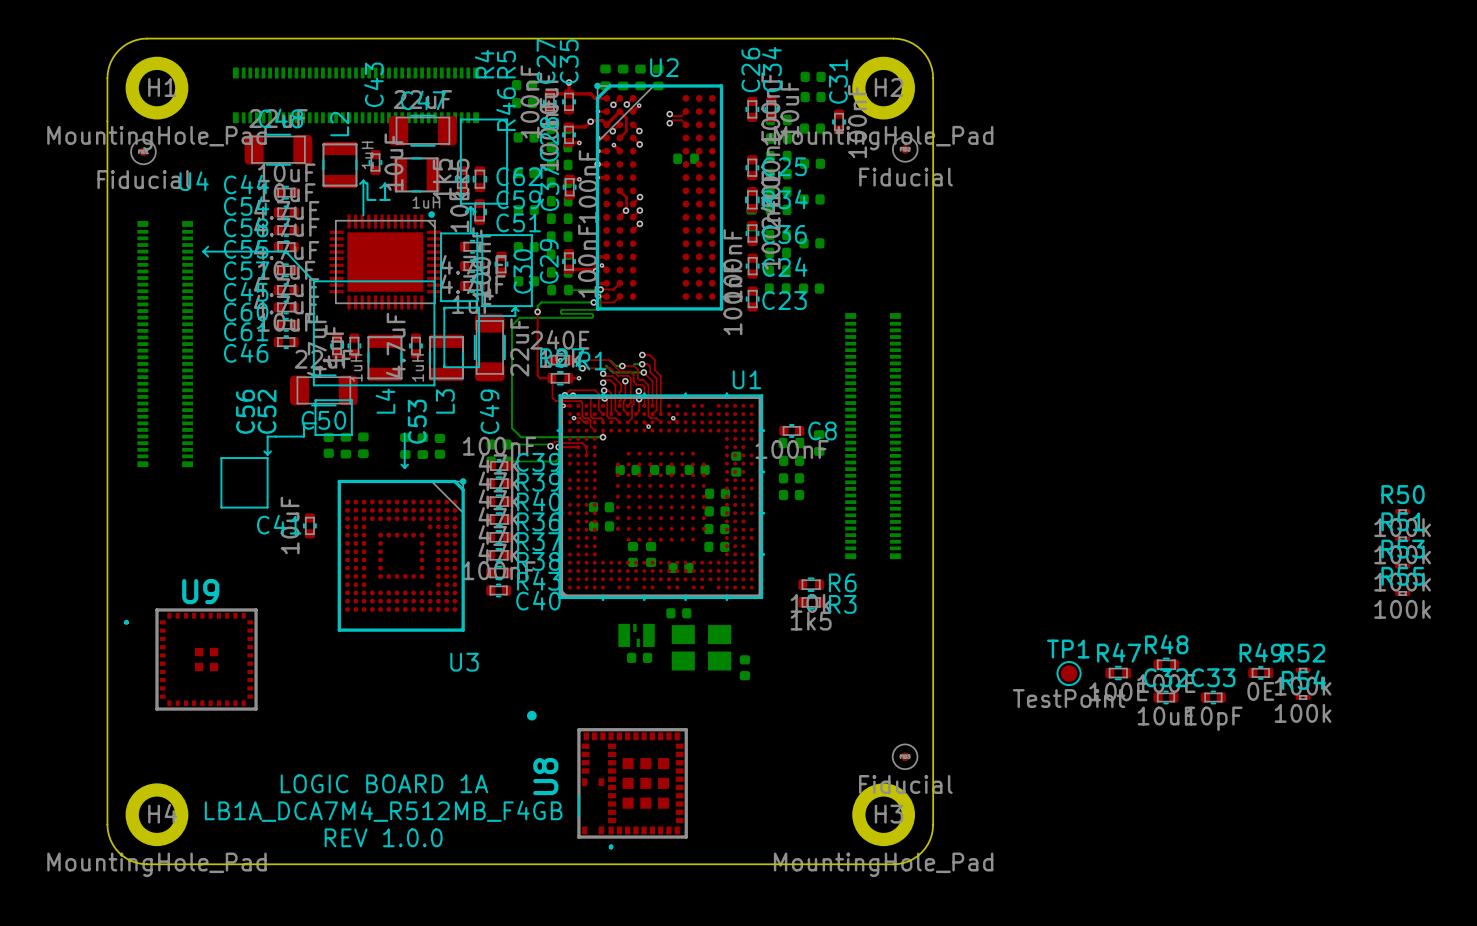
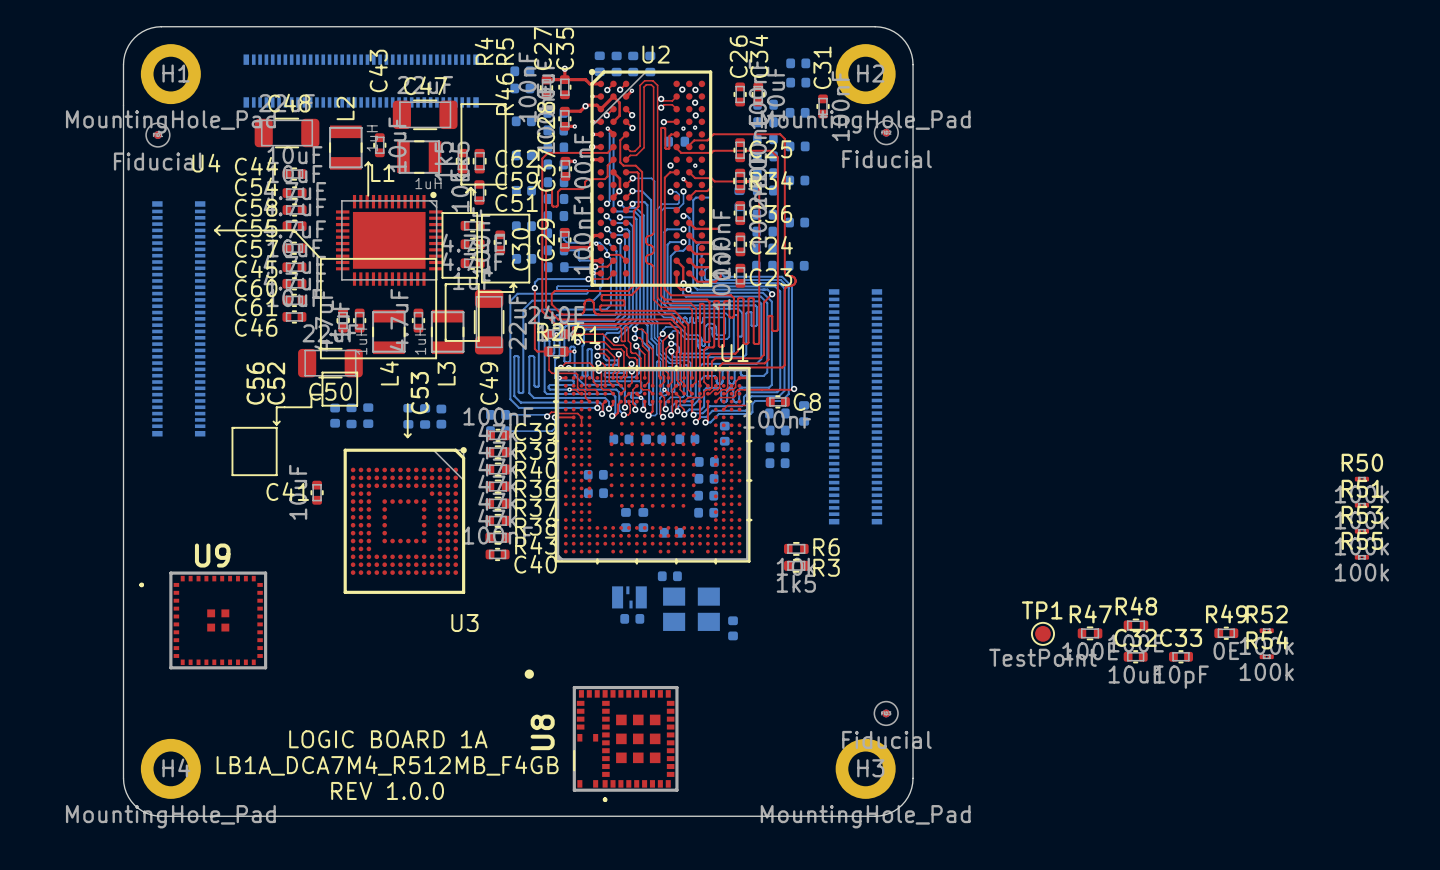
via: none -> (682, 89)
via: none -> (695, 89)
via: none -> (695, 102)
via: none -> (695, 115)
top track: none -> (676, 121) (663, 122)
via: none -> (663, 122)
via: none -> (695, 127)
via: none -> (683, 128)
top track: none -> (626, 134) (620, 140) (620, 162) (623, 165) (635, 165) (642, 172) (642, 284) (631, 295) (602, 295) (602, 300) (623, 300) (624, 305) (601, 305) (600, 309) (674, 310) (688, 324) (688, 370)
top track: none -> (676, 134) (669, 136) (669, 148) (666, 148) (665, 128) (661, 128) (661, 295) (665, 299) (707, 299) (709, 301) (708, 342) (704, 341) (704, 304) (700, 304) (700, 385)
top track: none -> (613, 147) (607, 152) (547, 152) (542, 158) (542, 311) (554, 323) (669, 323) (677, 330) (676, 380) (680, 383) (680, 389) (684, 393)
top track: none -> (626, 147) (630, 151) (634, 151) (640, 146) (640, 85) (644, 80) (653, 80) (657, 85) (657, 297) (662, 303) (691, 303) (696, 308) (696, 381) (692, 385)
top track: none -> (676, 147) (681, 152) (771, 150) (777, 157) (777, 329) (772, 330) (772, 316) (769, 315) (768, 359) (764, 363) (722, 363) (719, 366) (719, 387) (707, 393)
top track: none -> (689, 147) (694, 140) (707, 140) (713, 134) (780, 134) (784, 138) (784, 271) (786, 275) (793, 277) (795, 280) (793, 284) (787, 286) (784, 289) (784, 365) (782, 367) (729, 367) (727, 369) (727, 387) (715, 393)
top track: none -> (613, 159) (607, 165) (607, 176) (604, 179) (587, 179) (582, 189) (560, 189) (557, 191) (556, 206) (552, 205) (552, 190) (546, 191) (546, 307) (558, 319) (671, 319) (681, 328) (680, 379) (684, 385)
top track: none -> (626, 159) (630, 155) (636, 155) (644, 147) (644, 87) (651, 84) (653, 87) (653, 231) (652, 234) (646, 237) (645, 241) (647, 244) (652, 246) (653, 250) (652, 253) (646, 256) (645, 261) (653, 267) (653, 299) (661, 307) (689, 307) (692, 310) (692, 377)
via: none -> (670, 165)
via: none -> (695, 165)
top track: none -> (626, 172) (638, 173) (638, 206) (633, 211) (633, 285) (628, 290) (554, 290) (551, 294) (551, 304) (561, 314) (581, 313) (584, 310) (584, 302) (589, 299) (593, 302) (594, 310) (597, 314) (671, 314) (684, 327) (684, 377)
top track: none -> (676, 172) (670, 172) (664, 177) (664, 289) (670, 295) (731, 295) (733, 298) (732, 317) (729, 316) (729, 302) (724, 302) (722, 346) (718, 345) (718, 301) (714, 301) (714, 346) (706, 347) (704, 350) (704, 381) (707, 385)
top track: none -> (689, 172) (695, 178) (711, 178) (714, 181) (756, 181) (759, 184) (759, 343) (753, 343) (752, 297) (748, 298) (748, 342) (743, 343) (743, 299) (739, 297) (738, 351) (735, 353) (710, 353) (707, 356) (707, 377)
bottom track: none -> (632, 178) (651, 178) (654, 181) (654, 319) (657, 322) (657, 336) (662, 341) (662, 351) (671, 360) (688, 360) (690, 363) (690, 395) (687, 395) (687, 365) (684, 364) (683, 396) (670, 397) (665, 402) (665, 409)
top track: none -> (683, 179) (689, 184)
via: none -> (683, 179)
top track: none -> (711, 186) (707, 191) (695, 191) (689, 197)
bottom track: none -> (632, 191) (642, 191) (651, 200) (651, 319) (654, 323) (654, 337) (659, 343) (659, 353) (669, 363) (681, 364) (680, 384) (677, 384) (677, 367) (674, 367) (674, 391) (671, 391) (671, 367) (668, 367) (668, 392) (659, 397) (659, 413) (663, 416)
bottom track: none -> (683, 191) (683, 203) (678, 208) (664, 208) (661, 210) (661, 309) (665, 313) (725, 313) (729, 316) (729, 336) (727, 339) (715, 338) (712, 335) (712, 328) (710, 327) (708, 345) (703, 349) (698, 347) (697, 339) (685, 339) (677, 330) (673, 330) (671, 336)
via: none -> (683, 191)
bottom track: none -> (670, 191) (676, 191) (679, 194) (679, 202) (662, 204) (657, 209) (657, 311) (663, 317) (673, 317) (675, 322) (678, 317) (681, 322) (684, 317) (688, 322) (690, 317) (694, 322) (698, 317) (701, 322) (703, 317) (724, 317) (725, 333) (717, 335) (715, 325) (708, 324) (705, 327) (703, 345) (699, 336) (687, 335) (679, 326) (666, 326) (662, 330) (662, 333)
via: none -> (670, 191)
bottom track: none -> (710, 197) (695, 197) (693, 200) (693, 285) (697, 289) (767, 289) (772, 294)
bottom track: none -> (632, 202) (644, 202) (647, 205) (647, 320) (651, 324) (651, 339) (656, 344) (656, 354) (663, 361) (663, 392) (660, 391) (660, 362) (657, 361) (656, 413) (648, 415)
bottom track: none -> (607, 203) (609, 201) (609, 133) (612, 132) (613, 208) (616, 211) (634, 211) (640, 216) (640, 321) (635, 325) (635, 338)
via: none -> (607, 203)
bottom track: none -> (620, 203) (624, 207) (636, 207) (643, 215) (643, 321) (647, 325) (647, 340) (653, 346) (652, 404) (649, 403) (649, 348) (642, 341) (643, 330)
via: none -> (620, 203)
via: none -> (606, 216)
bottom track: none -> (683, 216) (689, 218) (689, 244) (683, 250) (676, 250) (670, 256) (670, 299) (673, 301) (758, 301) (761, 303) (761, 359) (756, 363) (702, 363) (695, 370) (695, 397) (691, 401) (677, 401) (671, 406) (670, 415)
via: none -> (683, 216)
via: none -> (619, 217)
top track: none -> (689, 222) (695, 228) (719, 228)
bottom track: none -> (607, 229) (613, 235) (625, 236) (625, 315) (615, 325) (566, 325) (564, 327) (564, 361) (570, 360) (570, 347) (573, 346) (574, 375) (584, 384) (619, 384) (624, 390) (624, 400) (632, 401) (635, 404) (635, 409)
via: none -> (607, 229)
bottom track: none -> (619, 229) (629, 231) (629, 317) (617, 329) (585, 329) (583, 331) (582, 375) (587, 375) (587, 349) (590, 349) (591, 377) (595, 381) (639, 381) (641, 391) (631, 392) (631, 397) (643, 399) (643, 409)
via: none -> (619, 229)
bottom track: none -> (683, 229) (667, 229) (664, 232) (664, 304) (668, 308) (738, 308) (742, 312) (742, 335) (737, 335) (737, 315) (734, 315) (733, 351) (731, 353) (680, 353) (679, 347) (675, 343) (671, 343)
via: none -> (683, 229)
bottom track: none -> (563, 233) (563, 239) (567, 242) (599, 242) (607, 250) (607, 254) (610, 258) (610, 304) (606, 309) (541, 309) (538, 312) (538, 385) (534, 385) (534, 357) (530, 355) (529, 393) (534, 397) (605, 397) (608, 401) (608, 408)
top track: none -> (689, 235) (696, 242) (708, 242)
bottom track: none -> (619, 241) (620, 314) (614, 320) (562, 320) (559, 323) (559, 355) (555, 359) (555, 377) (557, 380) (572, 380) (573, 384) (550, 385) (548, 388) (616, 389) (619, 392) (619, 410) (623, 414)
via: none -> (619, 241)
bottom track: none -> (606, 241) (616, 251) (616, 313) (614, 315) (556, 315) (554, 317) (553, 354) (549, 353) (549, 341) (544, 340) (544, 391) (547, 394) (612, 394) (615, 396) (615, 412) (612, 415)
via: none -> (606, 241)
bottom track: none -> (683, 242) (670, 242) (667, 244) (667, 302) (670, 305) (755, 305) (756, 325) (751, 325) (751, 312) (747, 312) (746, 354) (743, 357) (674, 357) (671, 351)
via: none -> (683, 242)
bottom track: none -> (708, 242) (700, 242) (697, 245) (697, 282) (700, 286) (775, 286) (780, 291) (780, 389) (777, 392) (748, 392) (743, 397) (743, 403) (741, 406) (709, 406) (702, 413) (693, 414)
top track: none -> (689, 248) (695, 253) (710, 253)
bottom track: none -> (564, 250) (577, 250) (579, 260) (599, 260) (602, 263) (602, 285) (600, 287) (600, 293) (593, 300) (532, 300) (523, 309) (523, 392) (518, 392) (518, 357) (515, 355) (514, 396) (520, 402) (599, 402) (603, 405) (602, 413)
bottom track: none -> (710, 253) (701, 255) (701, 280) (704, 283) (779, 283) (784, 288) (784, 390) (779, 396) (751, 396) (748, 399) (748, 408) (745, 410) (712, 410) (706, 417) (700, 417) (695, 422)
top track: none -> (607, 254) (620, 254) (626, 260)
via: none -> (607, 254)
top track: none -> (676, 260) (683, 267) (683, 283)
top track: none -> (689, 260) (695, 267) (710, 267)
bottom track: none -> (710, 267) (704, 270) (706, 279) (780, 279) (788, 287) (788, 394) (781, 400) (755, 400) (752, 403) (750, 413) (718, 413) (710, 422) (705, 422)
top track: none -> (676, 273) (676, 285) (680, 289) (688, 289)
bottom track: none -> (720, 273) (724, 276) (782, 276) (791, 286) (791, 386) (794, 388)
top track: none -> (720, 273) (720, 276) (715, 281) (697, 281) (689, 273)
bottom track: none -> (683, 283) (683, 293) (685, 296) (760, 296) (767, 303) (767, 372) (763, 375) (743, 375) (740, 369) (736, 368) (734, 370) (734, 381) (731, 384) (728, 381) (728, 370) (726, 368) (722, 370) (720, 383) (717, 382) (714, 376) (704, 376) (699, 381) (699, 399) (693, 405) (679, 405) (677, 411)
via: none -> (683, 283)
bottom track: none -> (688, 289) (691, 292) (763, 292) (771, 301) (771, 384) (769, 387) (741, 387)
via: none -> (688, 289)
top track: none -> (772, 294) (763, 302) (763, 354) (760, 358) (715, 358) (711, 361) (711, 387) (706, 389) (701, 397) (688, 397) (684, 401)
via: none -> (772, 294)
top track: none -> (663, 333) (658, 337) (658, 376) (660, 377)
via: none -> (662, 333)
bottom track: (610, 360) (615, 366) (622, 366) -> (619, 217) (634, 217) (636, 219) (636, 320) (615, 339)
top track: none -> (671, 336) (667, 336) (663, 340) (664, 381) (660, 385)
via: none -> (671, 336)
bottom track: (634, 364) (642, 364) -> none
bottom track: (606, 365) (612, 372) (643, 372) -> (606, 216) (613, 223) (629, 223) (632, 226) (632, 318) (618, 332) (607, 332) (603, 336) (603, 357) (606, 360) (617, 361) (616, 364) (605, 364) (604, 368) (625, 369) (624, 373) (605, 373) (604, 376) (635, 377) (639, 372) (639, 349) (636, 346)
top track: (622, 366) (635, 367) -> (573, 330) (573, 327) (619, 327) (621, 340) (624, 341) (625, 328) (627, 327) (628, 340)
top track: none -> (671, 343) (666, 348) (666, 371) (668, 377)
via: none -> (671, 343)
top track: none -> (671, 351) (672, 381) (668, 385)
via: none -> (671, 351)
top track: none -> (688, 370) (688, 389) (692, 393)
top track: none -> (745, 377) (739, 377) (735, 381) (735, 387) (723, 393)
top track: none -> (636, 385) (632, 389) (632, 403) (635, 409)
top track: none -> (676, 385) (672, 389) (670, 415)
bottom track: none -> (741, 387) (739, 389) (738, 400) (736, 402) (733, 400) (731, 387) (727, 389) (727, 400) (724, 402) (721, 400) (720, 387) (706, 387) (704, 390) (704, 406) (701, 409) (689, 409) (684, 414)
top track: none -> (794, 388) (737, 389) (733, 397) (719, 397) (715, 401)
via: none -> (794, 388)
top track: none -> (628, 393) (625, 397) (625, 407)
top track: none -> (660, 393) (664, 397) (665, 409)
top track: none -> (676, 393) (680, 397) (680, 405) (684, 409) (684, 414)
top track: none -> (605, 401) (602, 404) (602, 413)
top track: none -> (613, 401) (608, 408)
top track: none -> (621, 401) (618, 404) (618, 412) (612, 415)
top track: none -> (628, 401) (630, 413) (623, 414)
top track: none -> (644, 401) (643, 409)
top track: none -> (652, 401) (652, 411) (648, 415)
top track: none -> (660, 401) (660, 414) (663, 416)
top track: none -> (676, 401) (677, 411)
top track: none -> (692, 401) (693, 414)
top track: none -> (700, 401) (700, 417) (695, 422)
top track: none -> (707, 401) (707, 420) (705, 422)
top track: none -> (745, 405) (727, 405) (723, 409)
via: none -> (625, 407)
via: none -> (608, 408)
via: none -> (665, 409)
via: none -> (635, 409)
via: none -> (643, 409)
via: none -> (677, 411)
via: none -> (602, 413)
via: none -> (623, 414)
via: none -> (670, 415)
via: none -> (684, 414)
via: none -> (693, 414)
via: none -> (612, 415)
via: none -> (648, 415)
via: none -> (663, 416)
via: none -> (695, 422)
via: none -> (705, 422)

